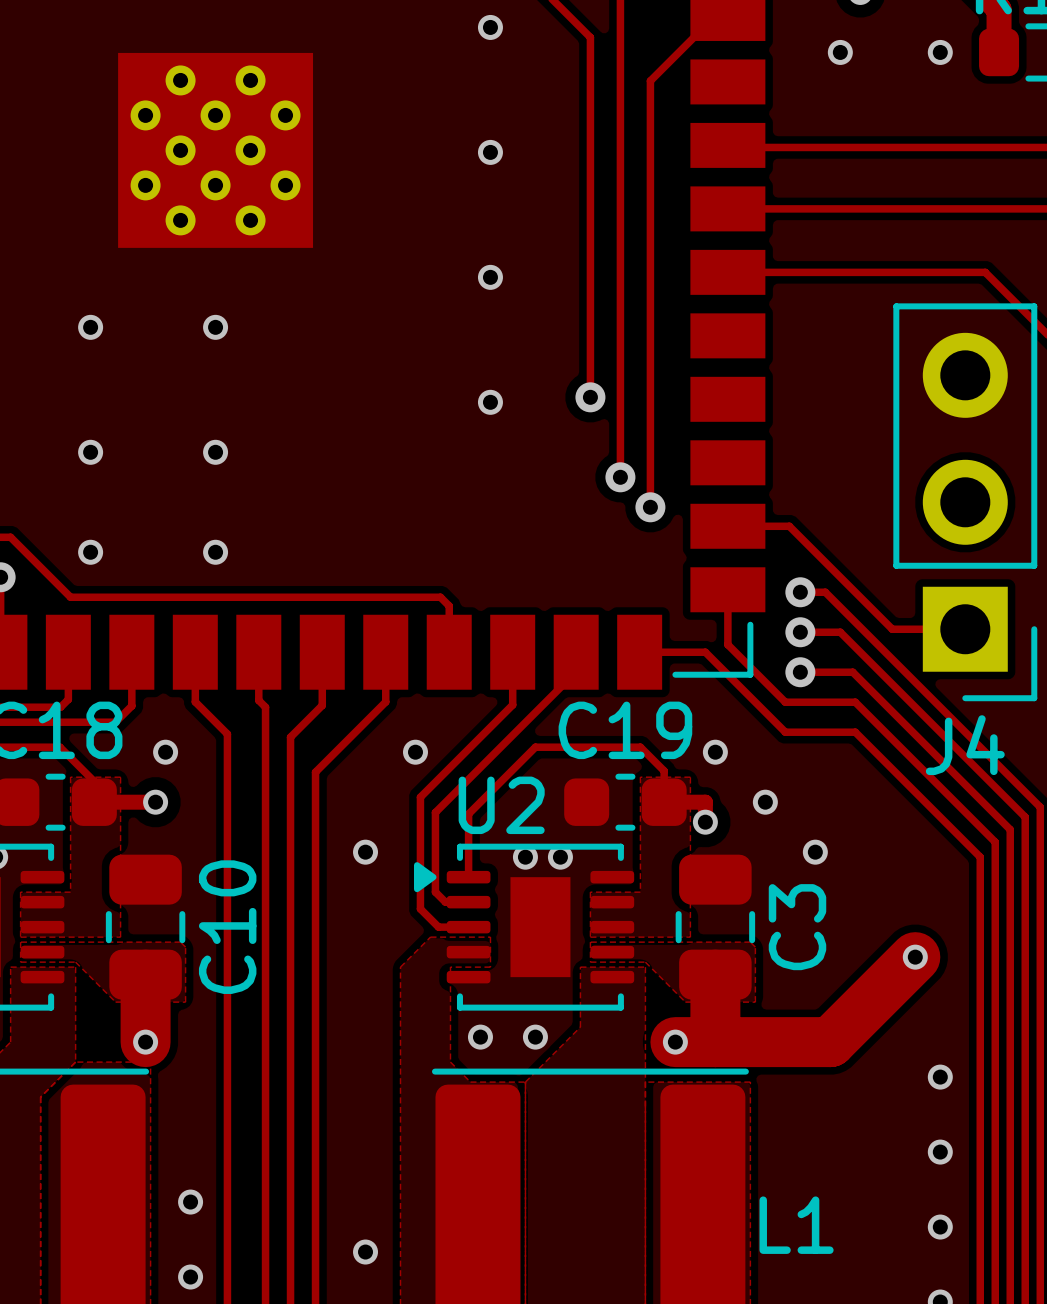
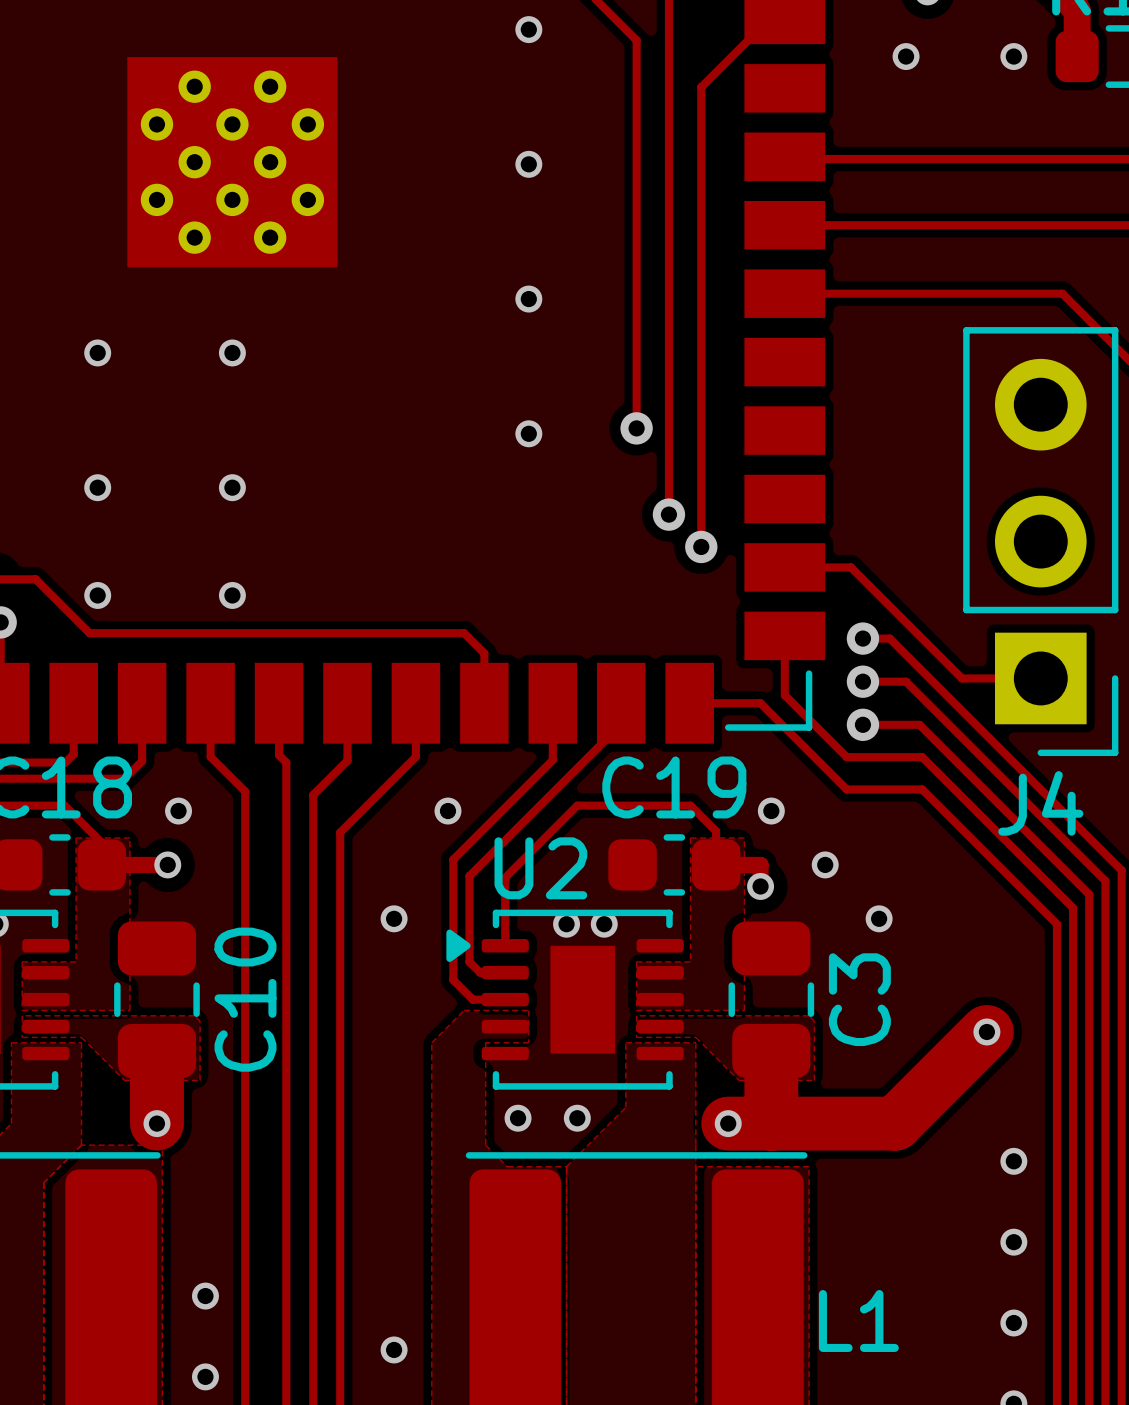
track: (10, 537) (70, 597) (440, 597) -> (11, 579) (35, 579) (89, 633) (464, 633) (474, 643)

